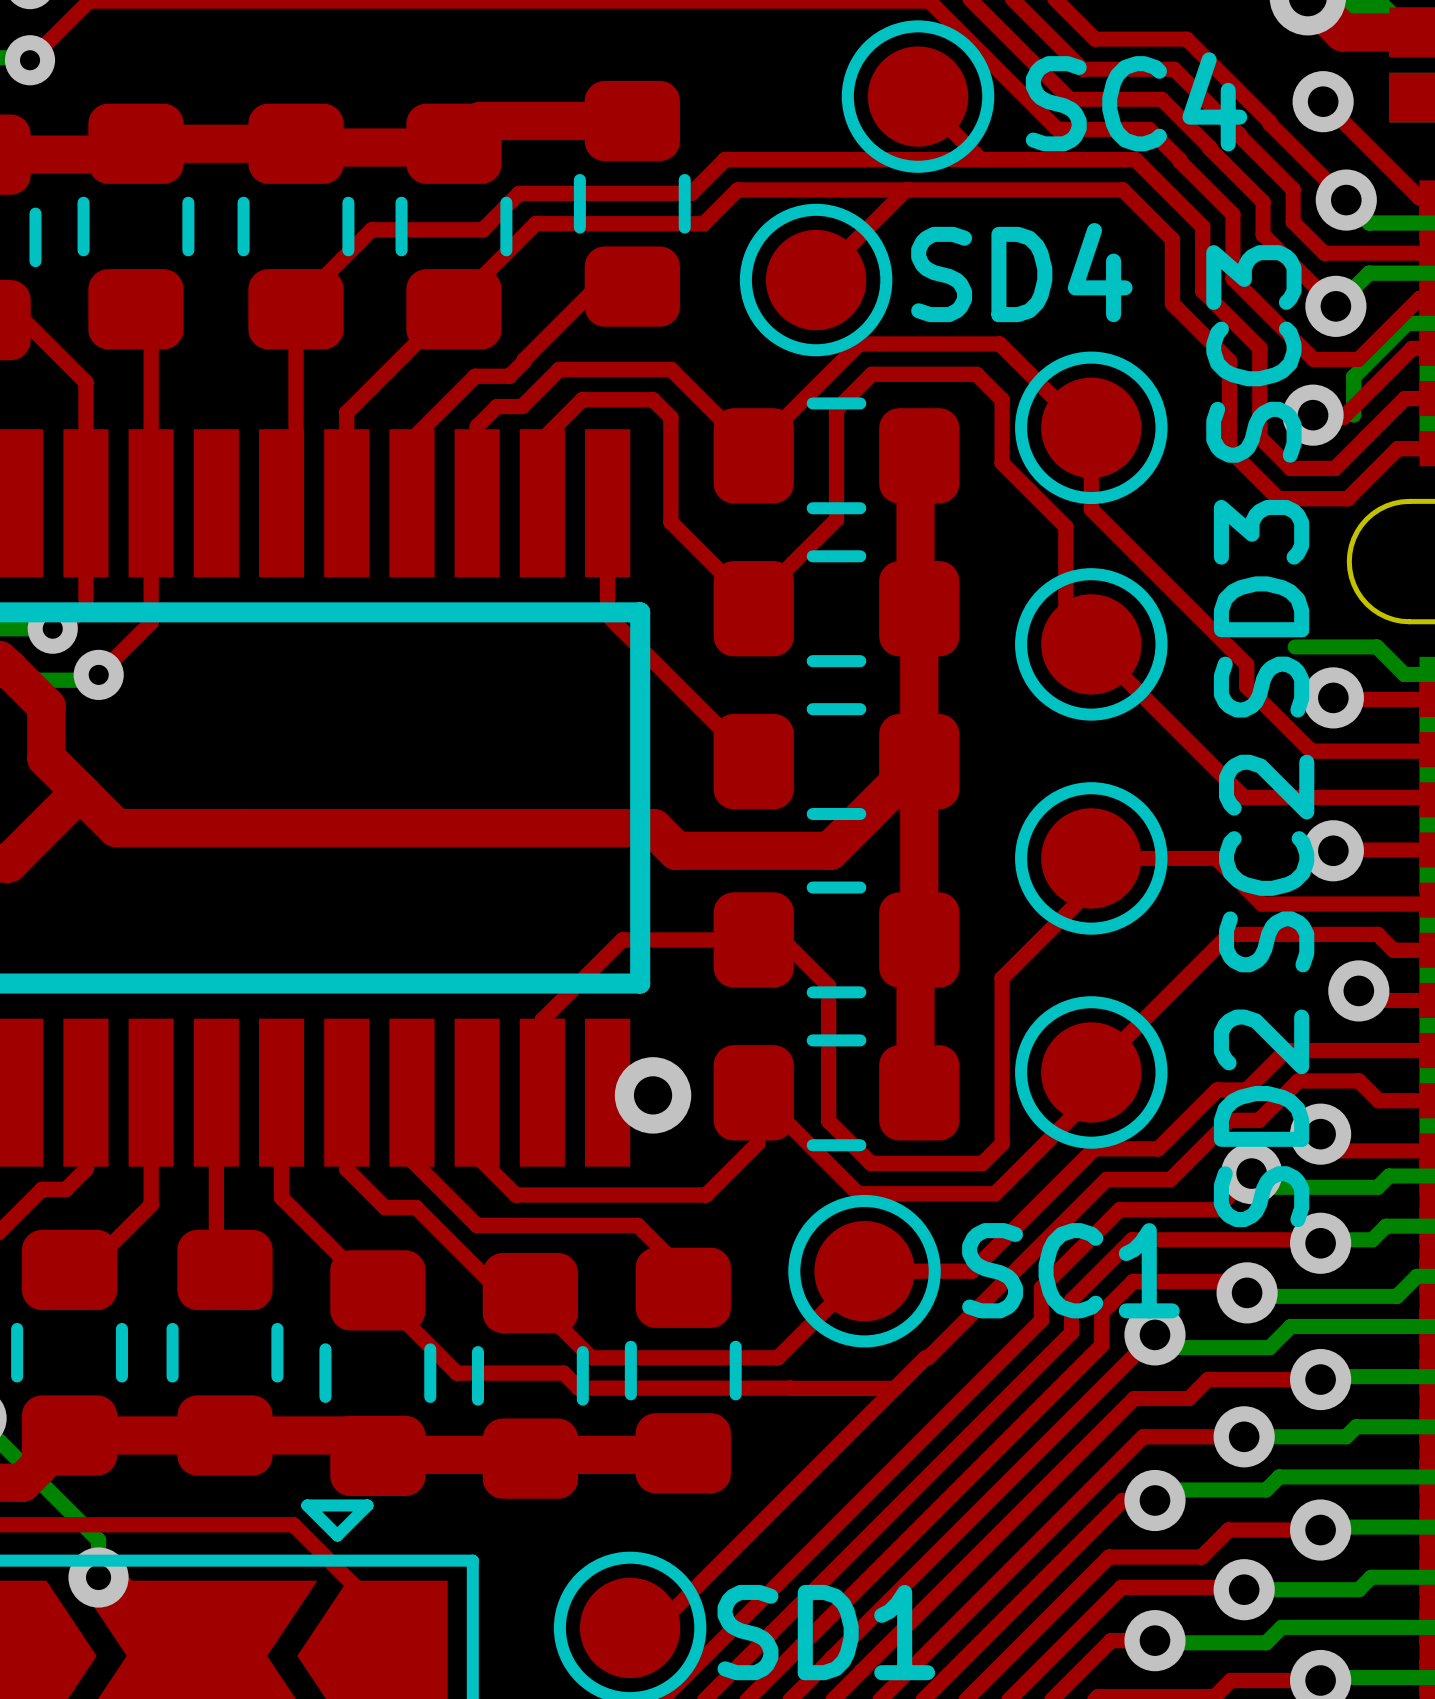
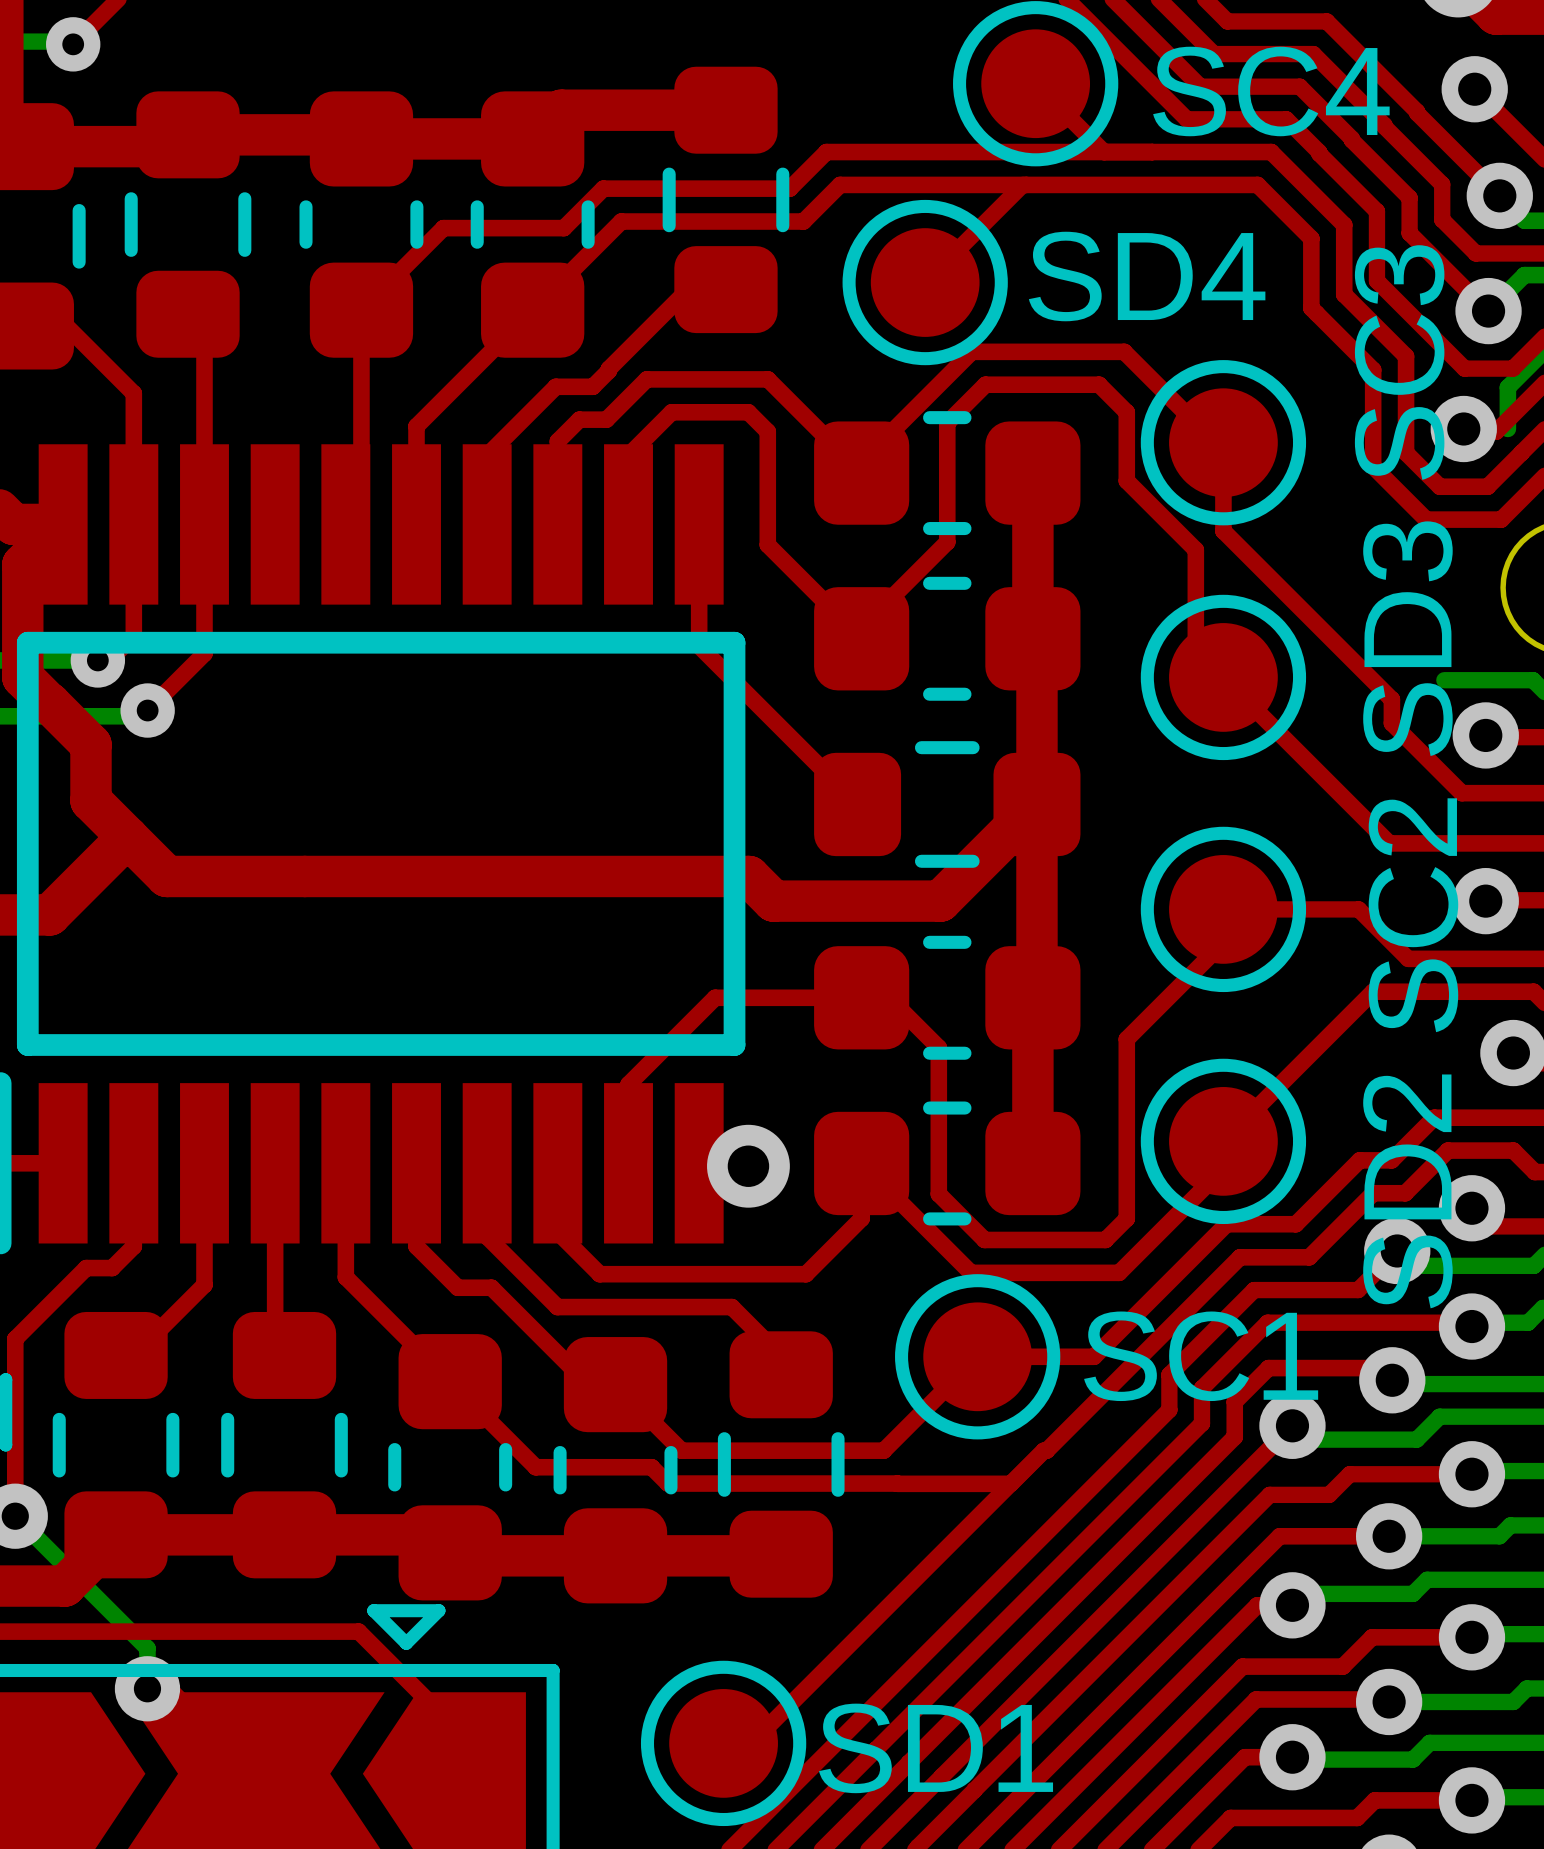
part footprint: [237, 103, 355, 350] -> [299, 91, 424, 358]
part footprint: [395, 103, 513, 350] -> [470, 91, 595, 358]
part footprint: [713, 397, 960, 515] -> [814, 411, 1081, 536]
part footprint: [713, 550, 960, 668] -> [814, 576, 1081, 701]
part footprint: [713, 881, 960, 999] -> [814, 935, 1081, 1060]
part footprint: [713, 1034, 960, 1152] -> [814, 1101, 1081, 1226]
part footprint: [319, 1250, 437, 1496] -> [388, 1334, 513, 1601]
part footprint: [471, 1252, 589, 1499] -> [553, 1337, 678, 1604]

